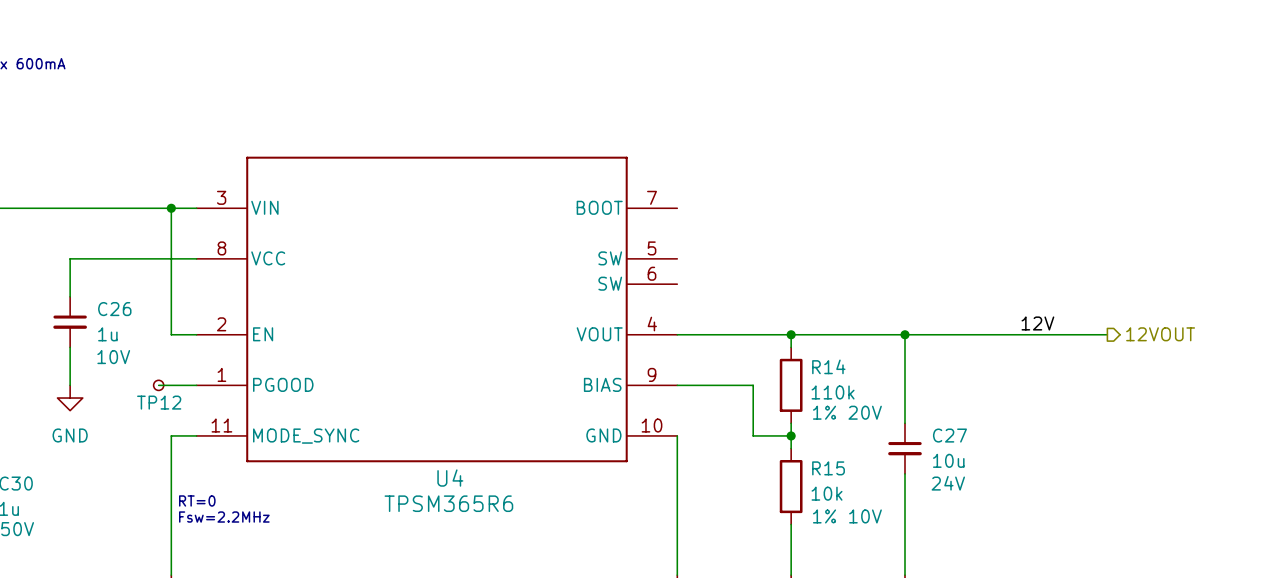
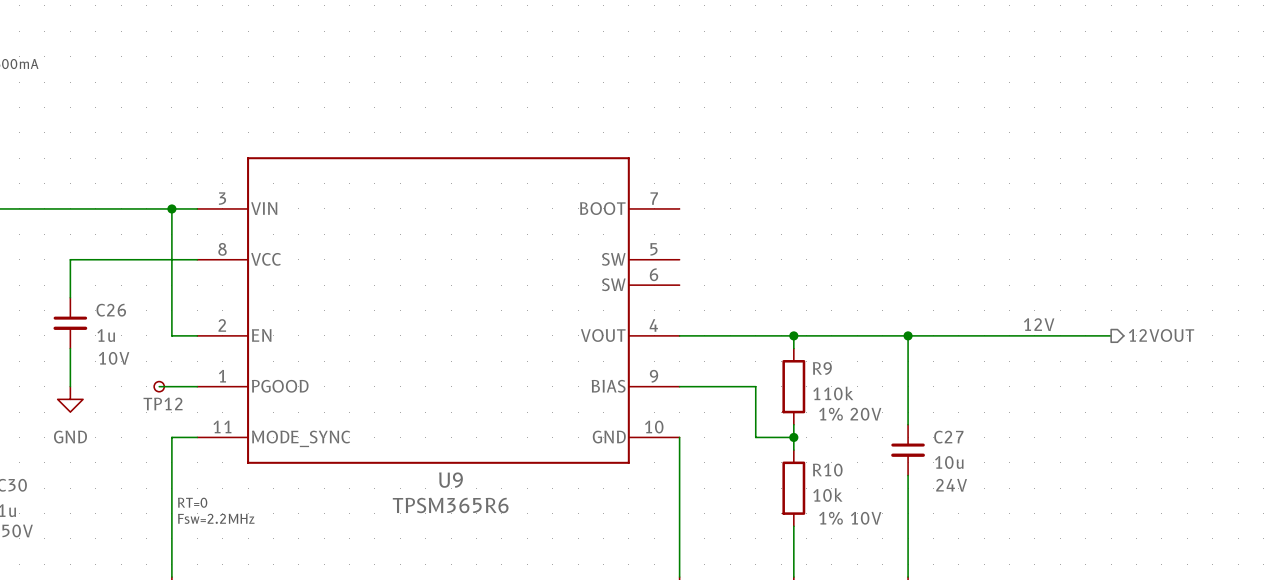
R14 name: R14 (828, 366) -> R9 (822, 368)
R15 name: R15 (828, 468) -> R10 (827, 470)
U4 name: U4 (450, 478) -> U9 (450, 480)

